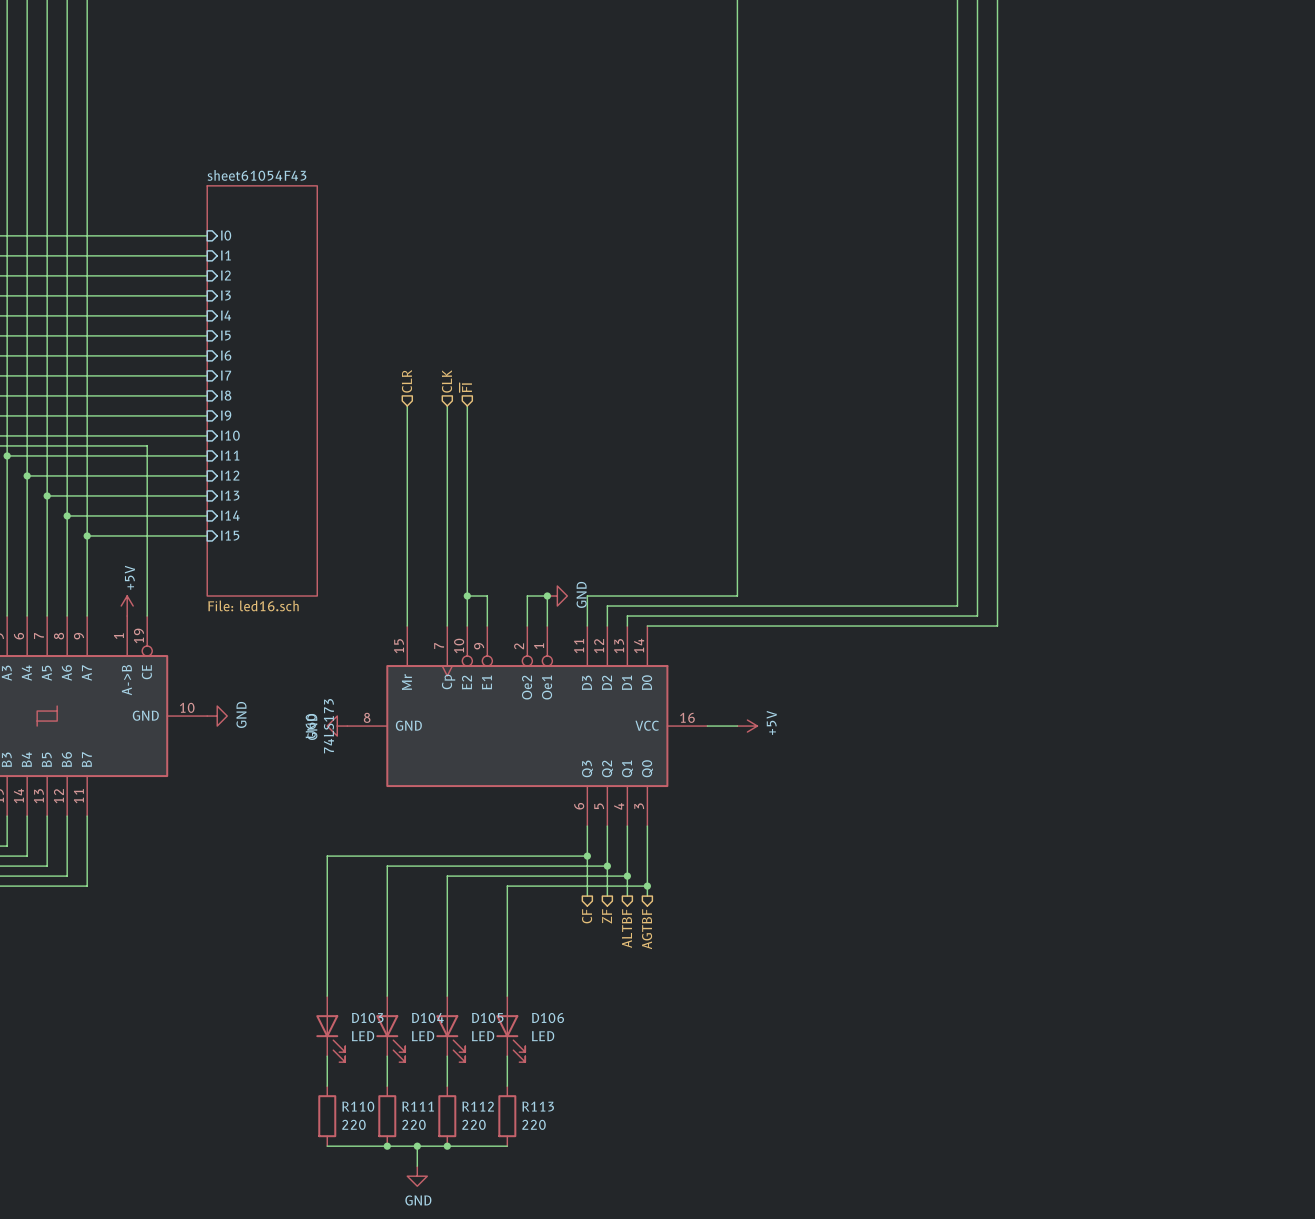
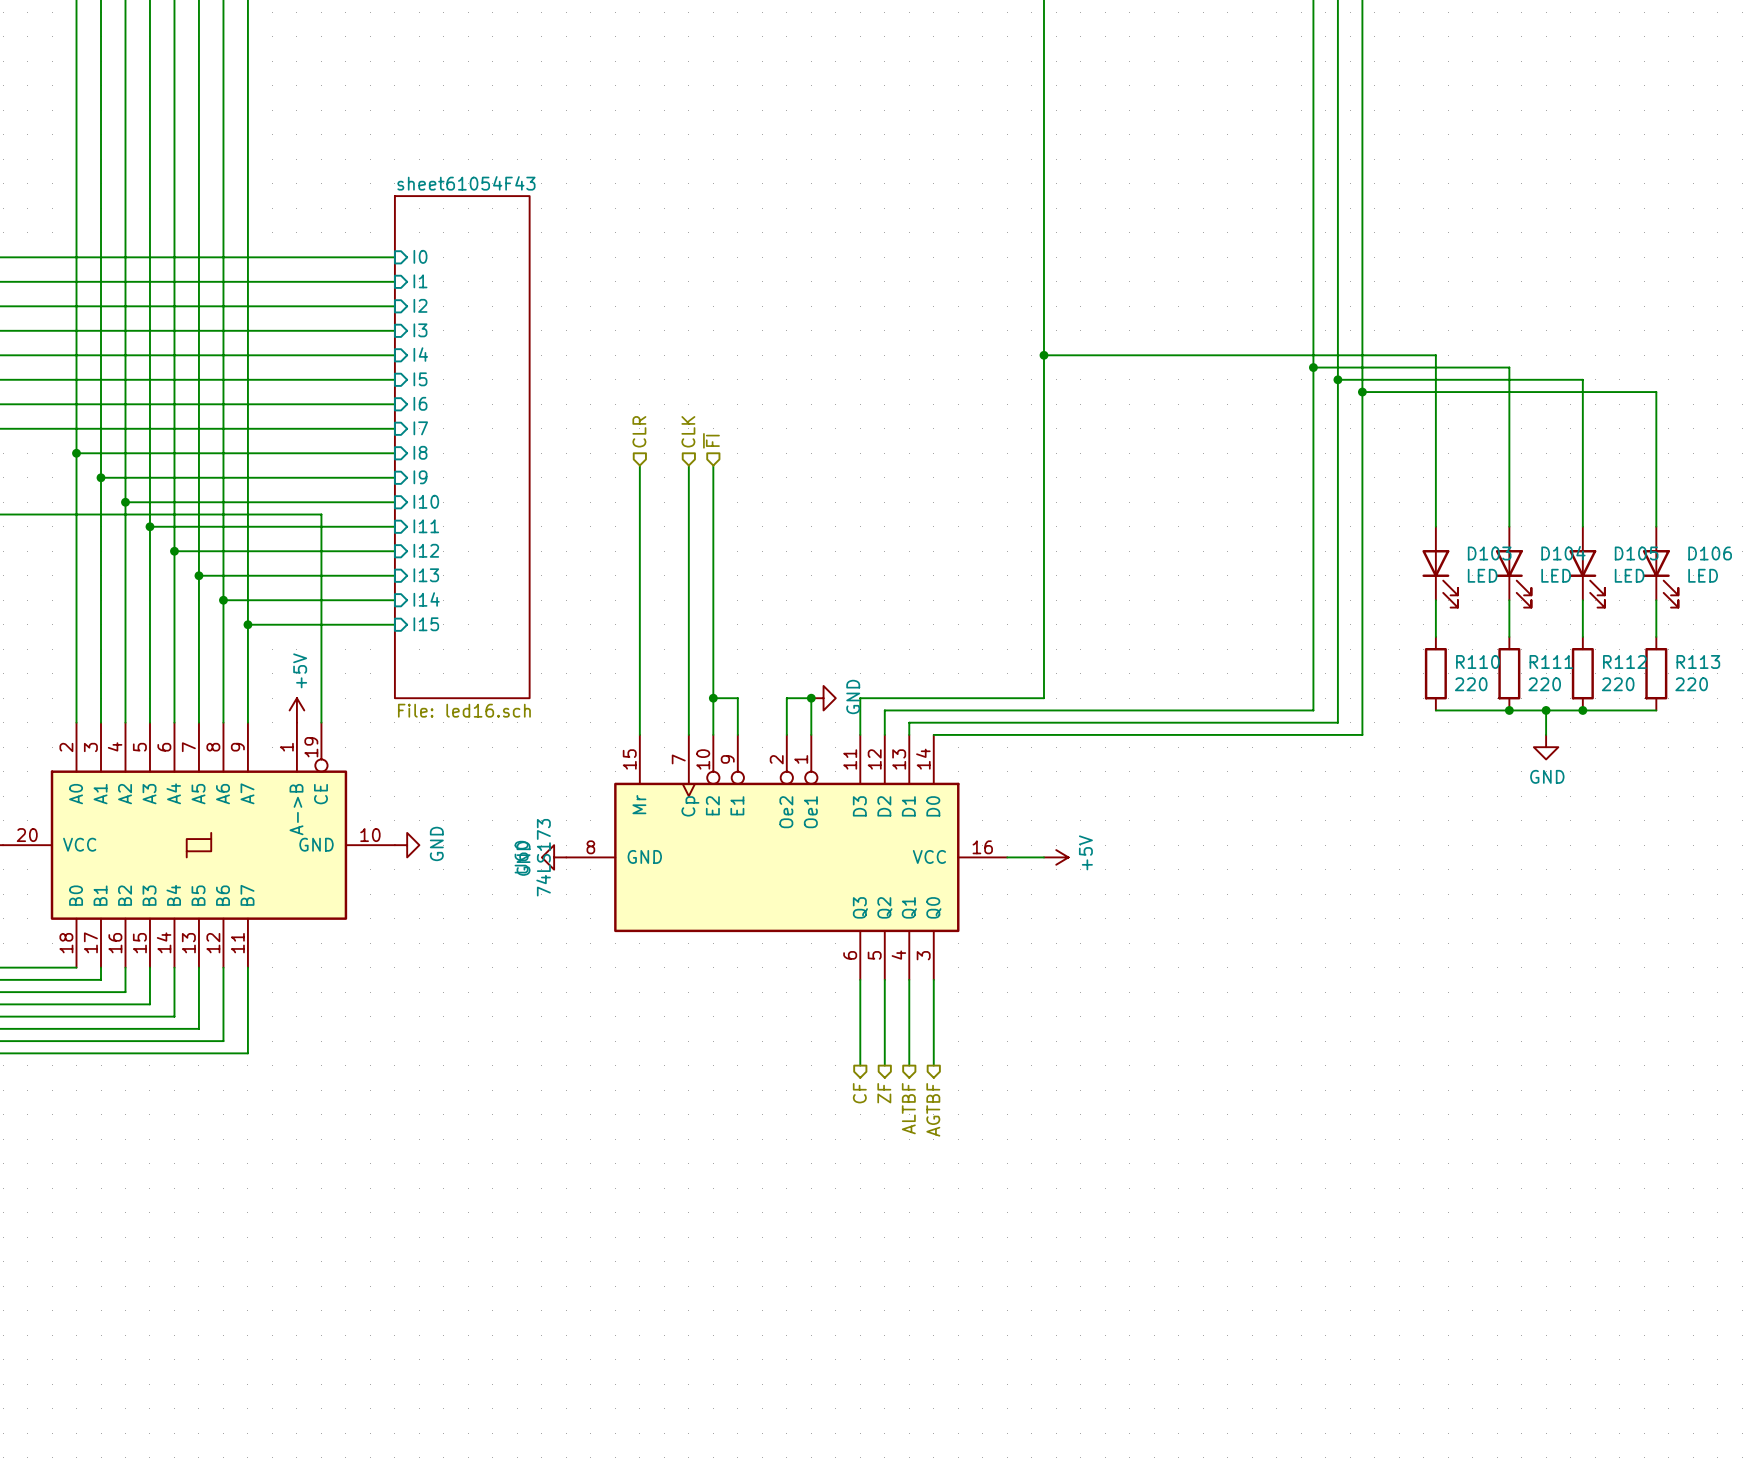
wire: none -> (1043, 355) (1435, 355) (1435, 526)
junction: none -> (1043, 355)
wire: none -> (1313, 367) (1509, 367) (1509, 526)
junction: none -> (1313, 367)
wire: none -> (1337, 379) (1582, 379) (1582, 526)
junction: none -> (1337, 379)
wire: none -> (1362, 392) (1656, 392) (1656, 526)
junction: none -> (1362, 392)
wire: none -> (1435, 600) (1435, 636)
wire: none -> (1509, 600) (1509, 636)
wire: none -> (1582, 600) (1582, 636)
wire: none -> (1656, 600) (1656, 636)
wire: none -> (1435, 710) (1656, 710)
junction: none -> (1509, 710)
wire: none -> (1546, 710) (1546, 734)
junction: none -> (1546, 710)
junction: none -> (1582, 710)
power symbol: none -> GND (1546, 747)
wire: (587, 856) (327, 856) (327, 996) -> none
junction: (587, 856) -> none
wire: (607, 866) (387, 866) (387, 996) -> none
junction: (607, 866) -> none
wire: (627, 876) (447, 876) (447, 996) -> none
junction: (627, 876) -> none
wire: (647, 886) (507, 886) (507, 996) -> none
junction: (647, 886) -> none
D103 position: (330, 1029) -> (1440, 567)
D104 position: (390, 1029) -> (1513, 567)
D105 position: (450, 1029) -> (1587, 567)
D106 position: (510, 1029) -> (1660, 567)
wire: (327, 1056) (327, 1086) -> none
wire: (387, 1056) (387, 1086) -> none
wire: (447, 1056) (447, 1086) -> none
wire: (507, 1056) (507, 1086) -> none
R110 position: (327, 1116) -> (1435, 673)
R111 position: (387, 1116) -> (1509, 673)
R112 position: (447, 1116) -> (1582, 673)
R113 position: (507, 1116) -> (1656, 673)
wire: (327, 1146) (507, 1146) -> none
junction: (387, 1146) -> none
wire: (417, 1146) (417, 1166) -> none
junction: (417, 1146) -> none
junction: (447, 1146) -> none
power symbol: GND (417, 1176) -> none

